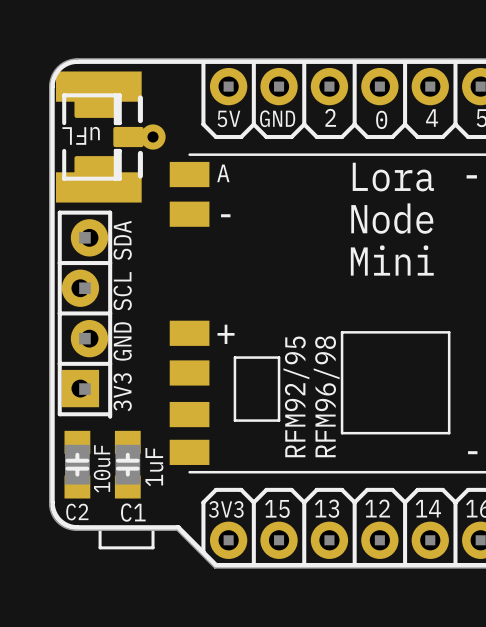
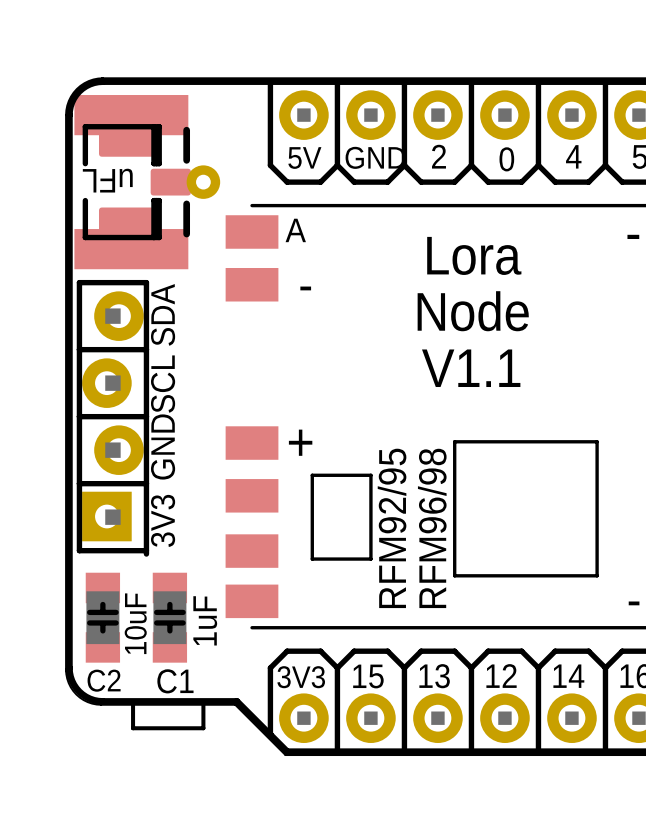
text position: Lora (393, 177) -> Lora (474, 255)
text position: Node (392, 218) -> Node (473, 311)
text: Mini (392, 260) -> V1.1 (471, 368)

